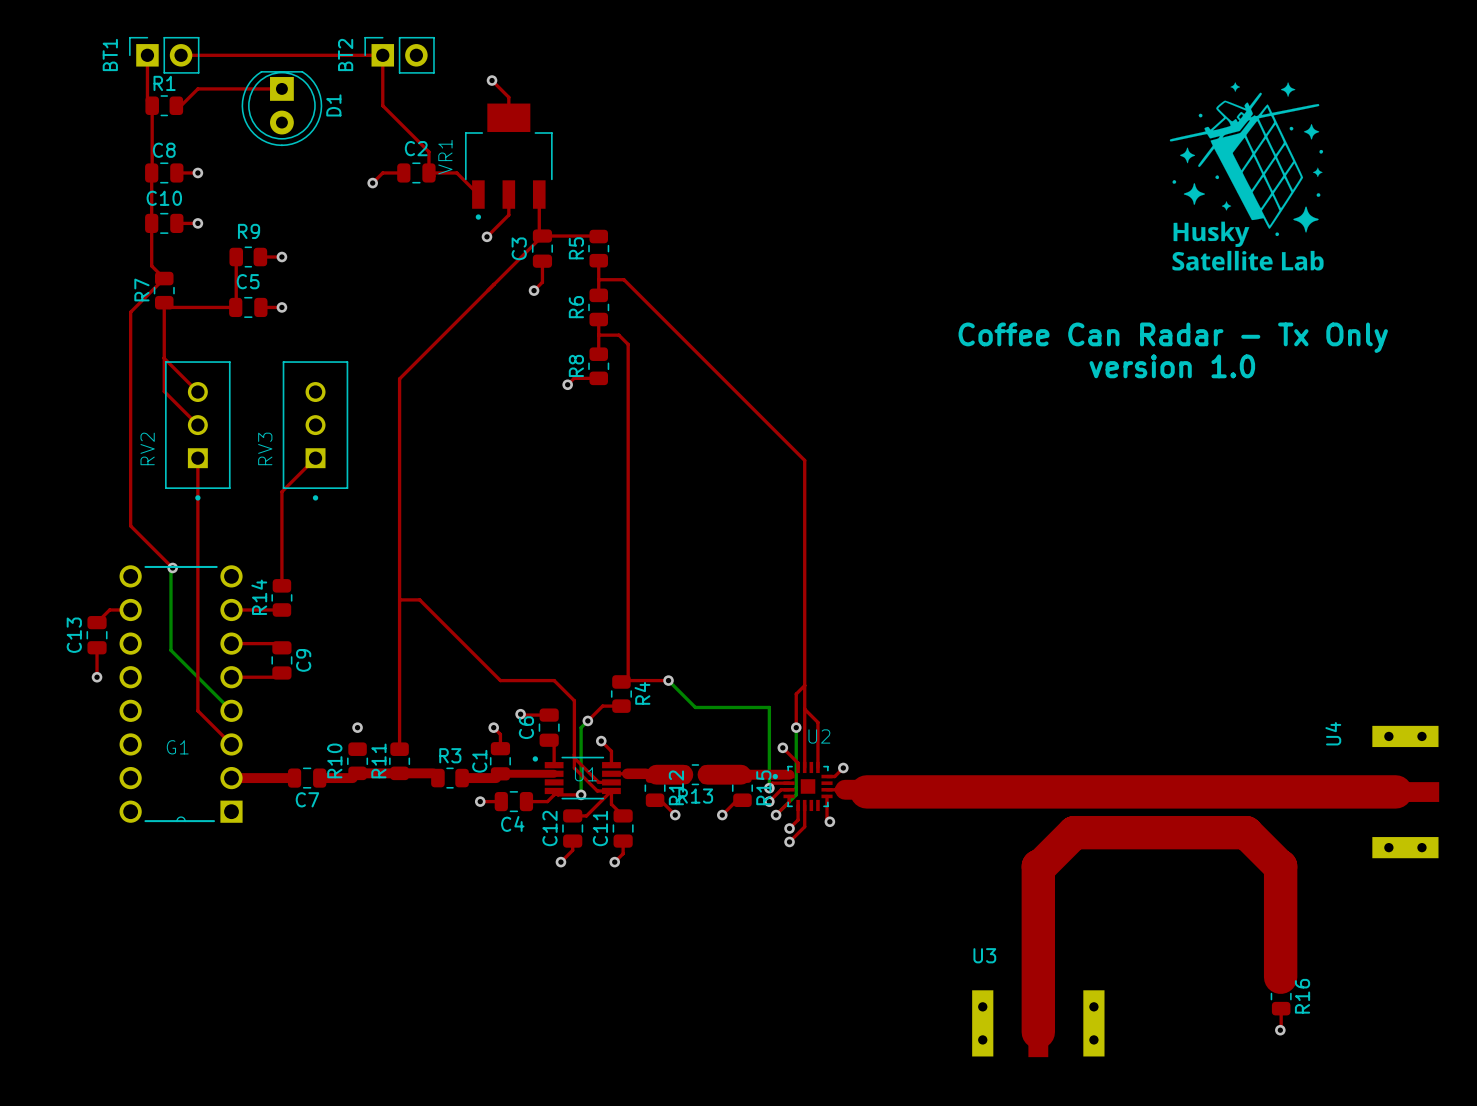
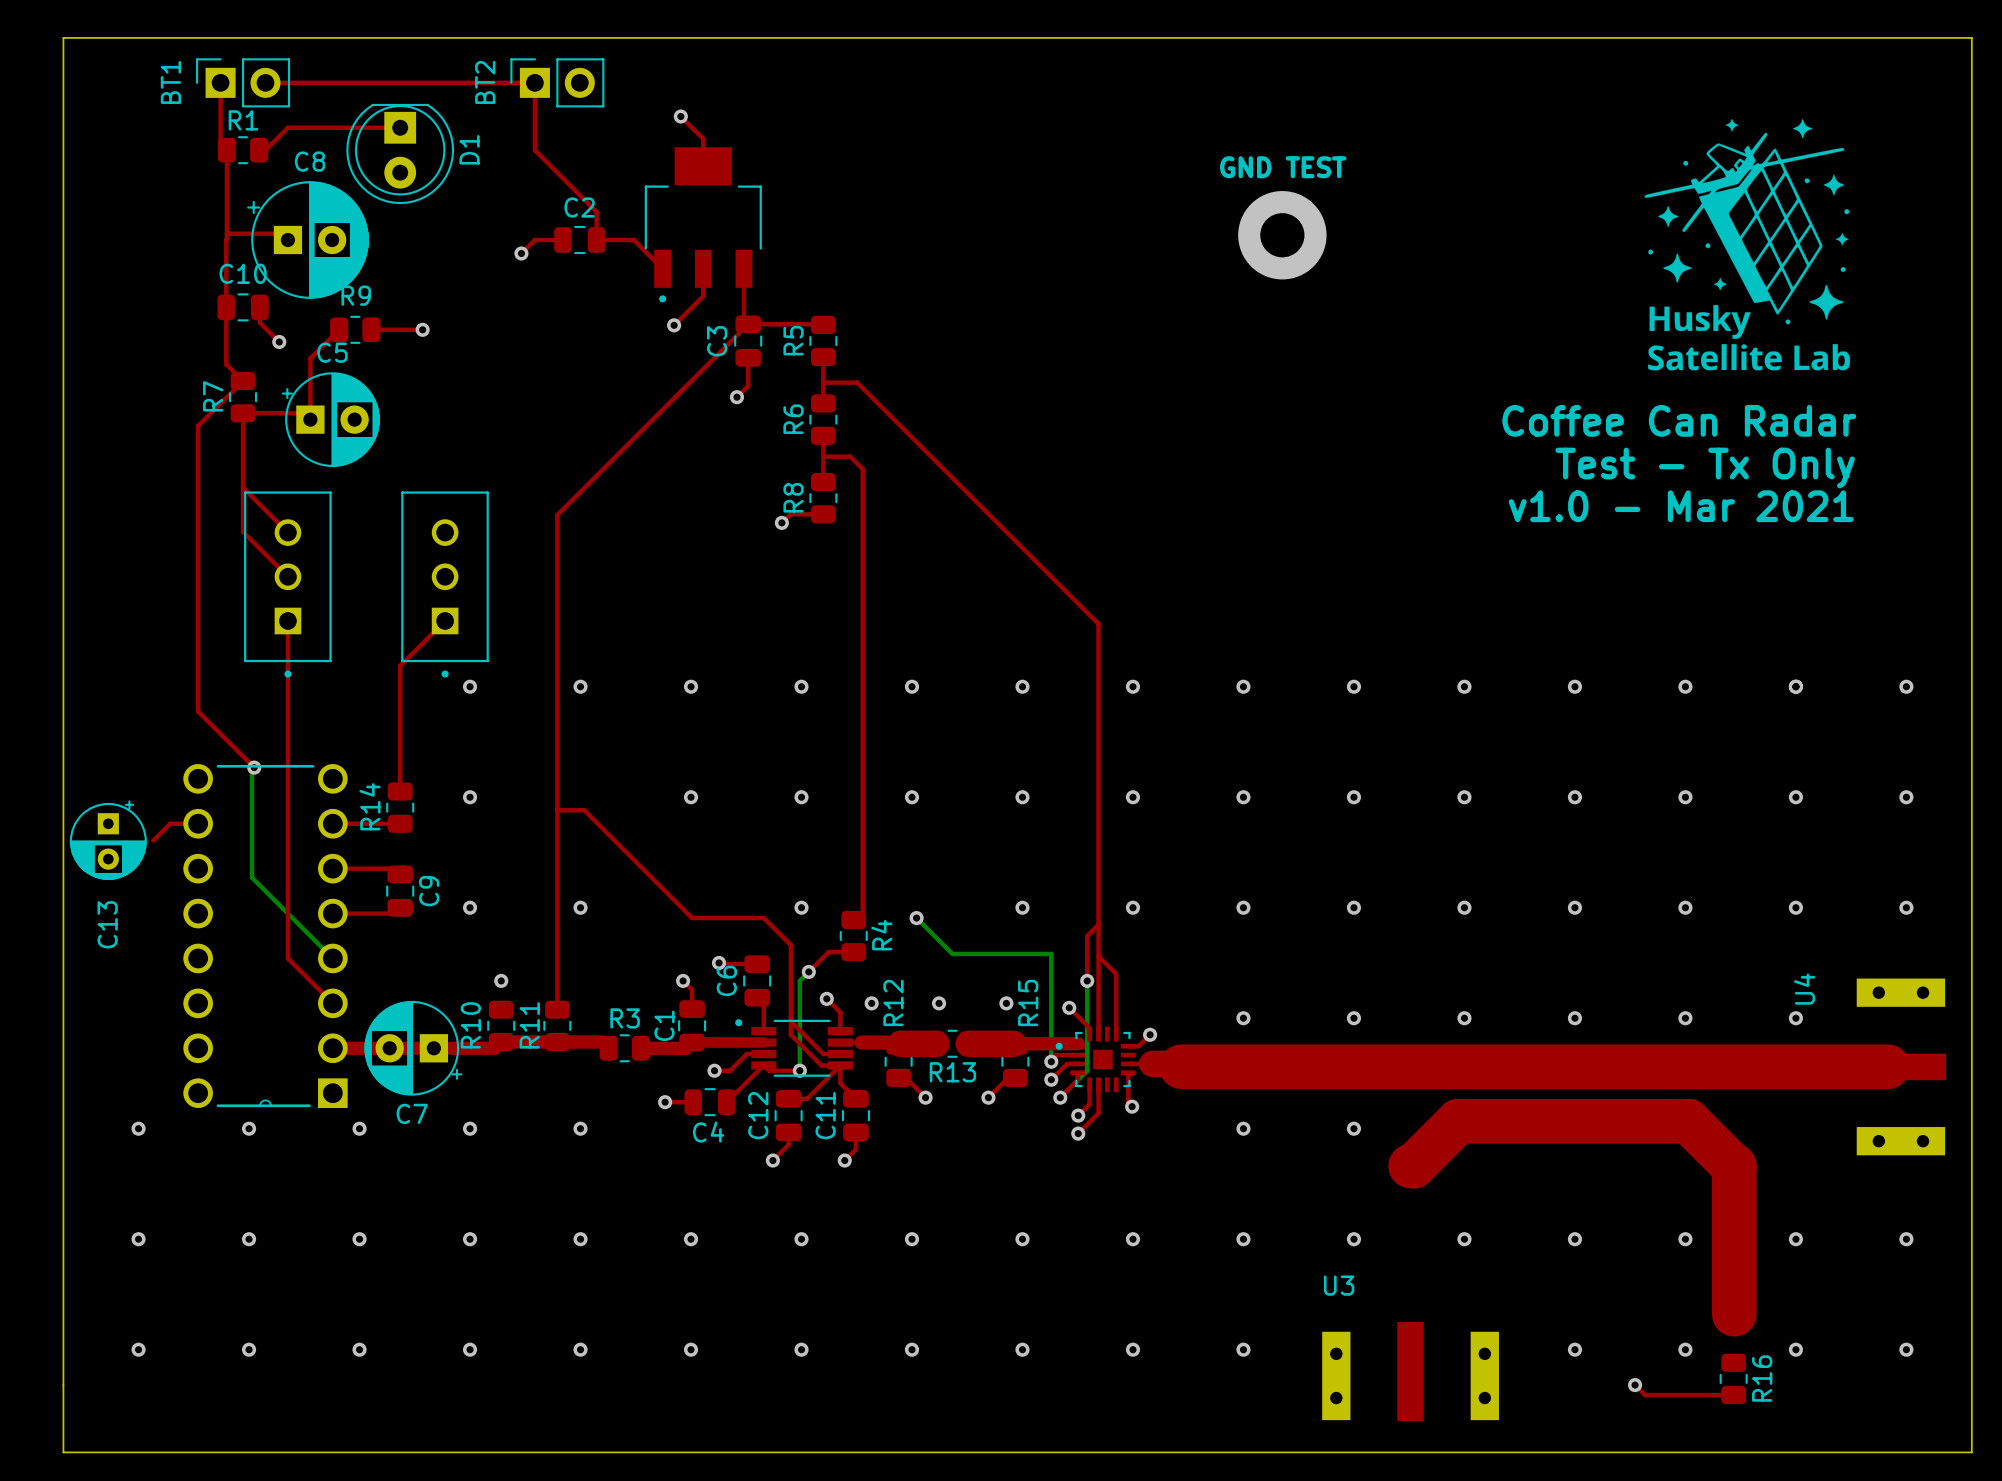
board edge: none -> (63, 37) (1971, 37) (1971, 1452) (63, 1452) (63, 37)
text: none -> GND TEST (1283, 167)
C8 name position: C8 (164, 150) -> C8 (310, 161)
VR1 name: VR1 (445, 157) -> none
C8 footprint: [145, 162, 184, 184] -> [247, 181, 369, 299]
via: none -> (1282, 235)
top track: (176, 172) (197, 172) -> (226, 233) (281, 233) (287, 240)
via: (197, 172) -> none
drawing position: (1246, 176) -> (1747, 244)
top track: (176, 223) (197, 223) -> (259, 307) (259, 322) (279, 342)
via position: (197, 223) -> (279, 342)
top track: none -> (339, 329) (310, 358) (310, 419) (304, 413) (243, 413)
top track: none -> (371, 329) (422, 329)
top track: (236, 257) (235, 307) (168, 307) -> none
R9 position: (248, 257) -> (355, 329)
top track: (260, 257) (281, 257) -> none
via position: (281, 257) -> (422, 329)
C5 footprint: [229, 296, 268, 318] -> [281, 372, 380, 468]
top track: (260, 307) (281, 307) -> none
via: (281, 307) -> none
text: Coffee Can Radar - Tx Only (1173, 337) -> Coffee Can Radar (1679, 420)
text: none -> Test - Tx Only (1705, 467)
text: version 1.0 (1172, 366) -> none
text: none -> v1.0 - Mar 2021 (1681, 506)
RV2 name: RV2 (147, 448) -> none
RV3 name: RV3 (265, 448) -> none
via: none -> (470, 686)
via: none -> (580, 686)
via: none -> (691, 686)
via: none -> (801, 686)
via: none -> (912, 686)
via: none -> (1022, 686)
via: none -> (1132, 686)
via: none -> (1243, 686)
via: none -> (1353, 686)
via: none -> (1464, 686)
via: none -> (1574, 686)
via: none -> (1685, 686)
via: none -> (1795, 686)
via: none -> (1906, 686)
via: none -> (470, 797)
via: none -> (691, 797)
via: none -> (801, 797)
via: none -> (912, 797)
via: none -> (1022, 797)
via: none -> (1132, 797)
via: none -> (1243, 797)
via: none -> (1353, 797)
via: none -> (1464, 797)
via: none -> (1574, 797)
via: none -> (1685, 797)
via: none -> (1795, 797)
via: none -> (1906, 797)
C13 footprint: [86, 616, 108, 655] -> [69, 800, 147, 880]
C13 name position: C13 (74, 635) -> C13 (107, 924)
top track: (97, 647) (97, 677) -> none
via: none -> (470, 907)
via: none -> (580, 907)
via: none -> (801, 907)
via: none -> (1022, 907)
via: none -> (1132, 907)
via: none -> (1243, 907)
via: none -> (1353, 907)
via: none -> (1464, 907)
via: none -> (1574, 907)
via: none -> (1685, 907)
via: none -> (1795, 907)
via: none -> (1906, 907)
via: (97, 677) -> none
top track: (668, 680) (621, 681) -> none
U2 name: U2 (819, 736) -> none
via: none -> (871, 1003)
via: none -> (939, 1003)
via: none -> (1006, 1003)
G1 name: G1 (177, 747) -> none
via: none -> (1243, 1018)
via: none -> (1353, 1018)
via: none -> (1464, 1018)
via: none -> (1574, 1018)
via: none -> (1685, 1018)
via: none -> (1795, 1018)
C7 footprint: [287, 767, 327, 789] -> [364, 1000, 463, 1096]
U1 name: U1 (585, 774) -> none
top track: none -> (763, 1054) (746, 1054) (730, 1070) (714, 1070)
R12 name position: R12 (676, 787) -> R12 (893, 1002)
R15 name position: R15 (763, 787) -> R15 (1028, 1002)
top track: (554, 790) (554, 794) (547, 801) (526, 801) -> (763, 1065) (726, 1102)
via: none -> (714, 1070)
C7 name position: C7 (307, 799) -> C7 (412, 1113)
top track: (480, 801) (501, 801) -> (665, 1102) (693, 1102)
via position: (480, 801) -> (665, 1102)
C4 position: (513, 801) -> (710, 1102)
via: none -> (138, 1128)
via: none -> (249, 1128)
via: none -> (359, 1128)
via: none -> (470, 1128)
via: none -> (580, 1128)
via: none -> (1243, 1128)
via: none -> (1353, 1128)
top track: (1038, 866) (1038, 1032) -> none
via: none -> (138, 1239)
via: none -> (249, 1239)
via: none -> (359, 1239)
via: none -> (470, 1239)
via: none -> (580, 1239)
via: none -> (691, 1239)
via: none -> (801, 1239)
via: none -> (912, 1239)
via: none -> (1022, 1239)
via: none -> (1132, 1239)
via: none -> (1243, 1239)
via: none -> (1353, 1239)
via: none -> (1464, 1239)
via: none -> (1574, 1239)
via: none -> (1685, 1239)
via: none -> (1795, 1239)
via: none -> (1906, 1239)
R16 position: (1281, 996) -> (1733, 1378)
via: none -> (138, 1349)
via: none -> (249, 1349)
via: none -> (359, 1349)
via: none -> (470, 1349)
via: none -> (580, 1349)
via: none -> (691, 1349)
via: none -> (801, 1349)
via: none -> (912, 1349)
via: none -> (1022, 1349)
via: none -> (1132, 1349)
via: none -> (1243, 1349)
via: none -> (1574, 1349)
via: none -> (1685, 1349)
via: none -> (1795, 1349)
via: none -> (1906, 1349)
top track: (1281, 1008) (1280, 1030) -> none
top track: none -> (1635, 1385) (1645, 1395) (1733, 1395)
via: none -> (1635, 1385)
via: (1280, 1030) -> none

